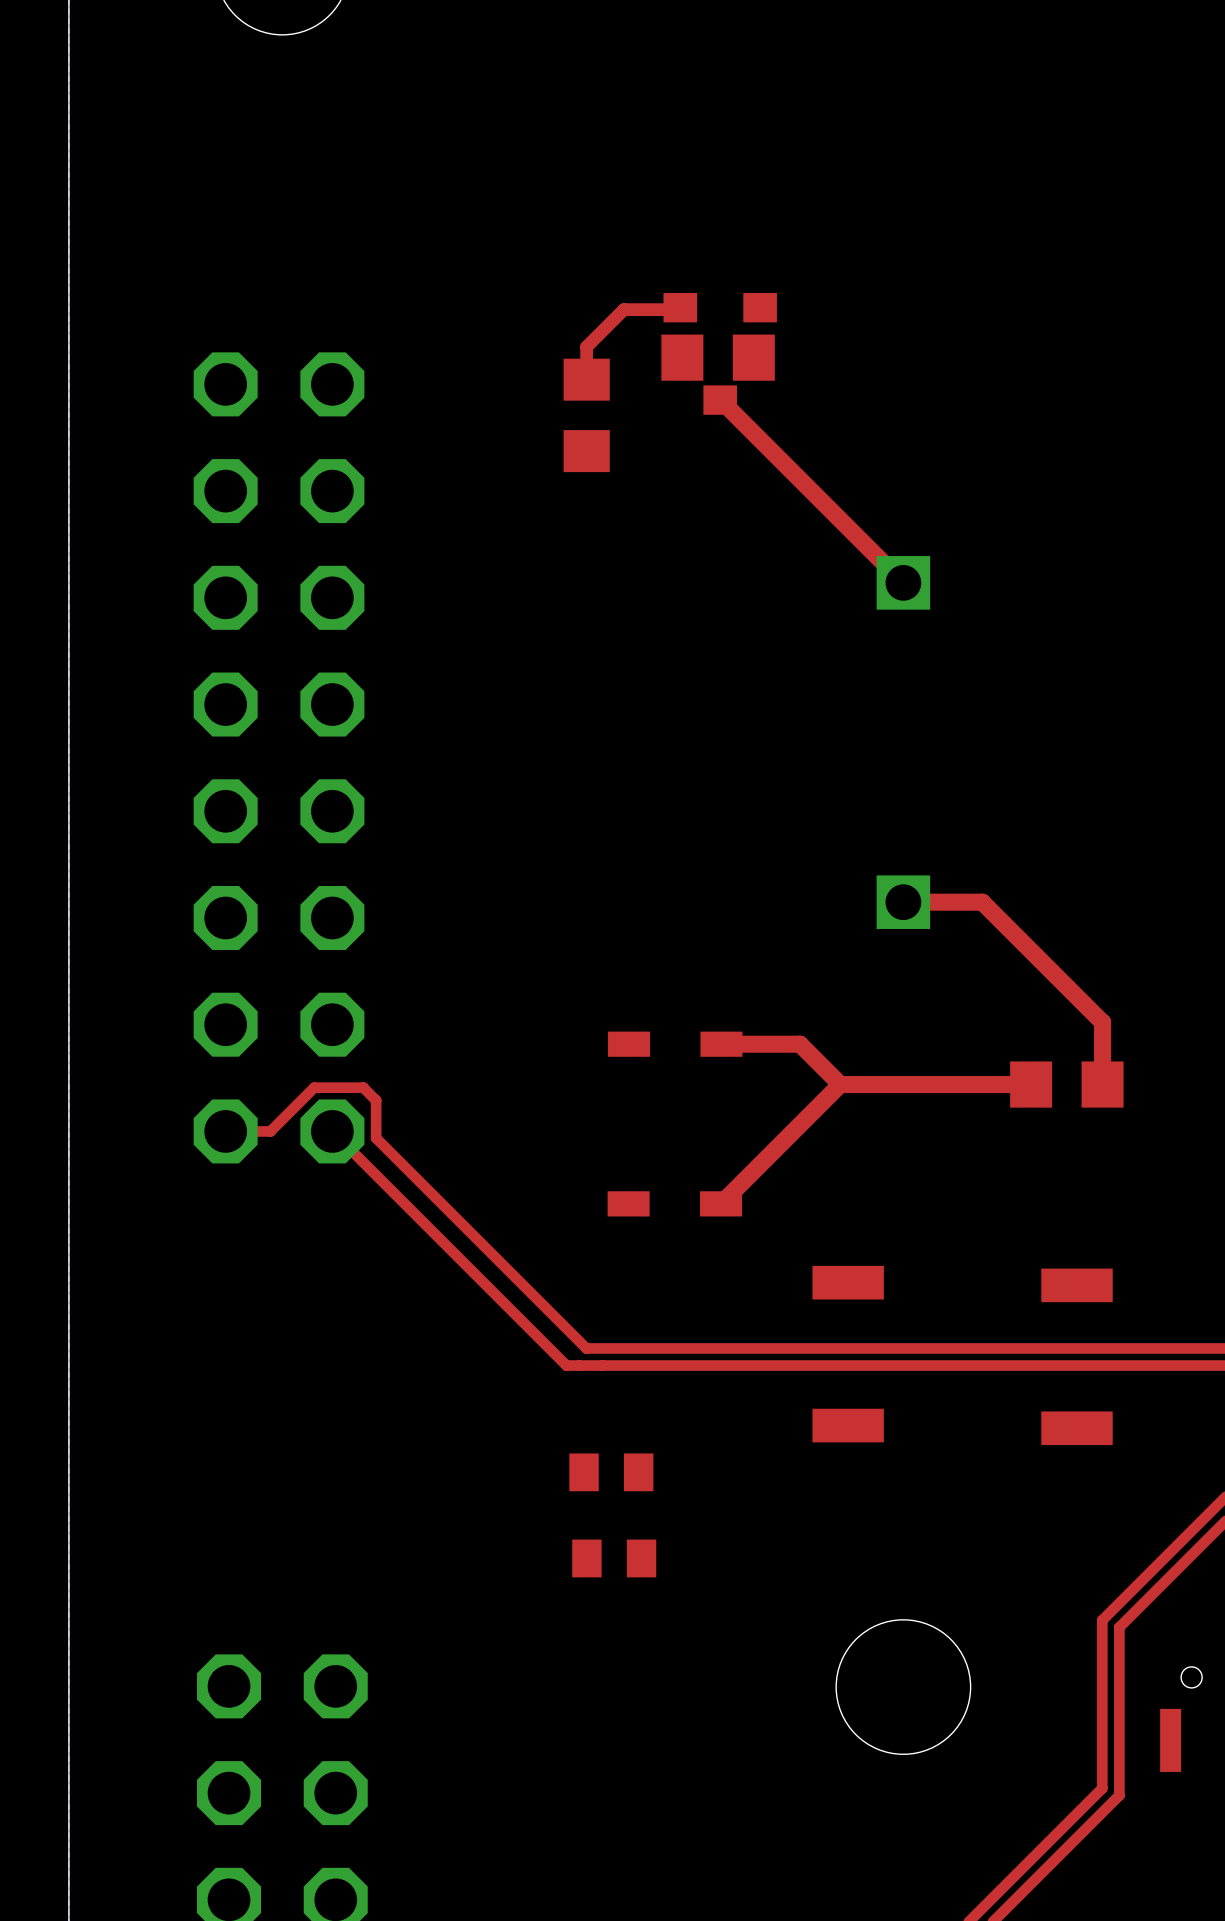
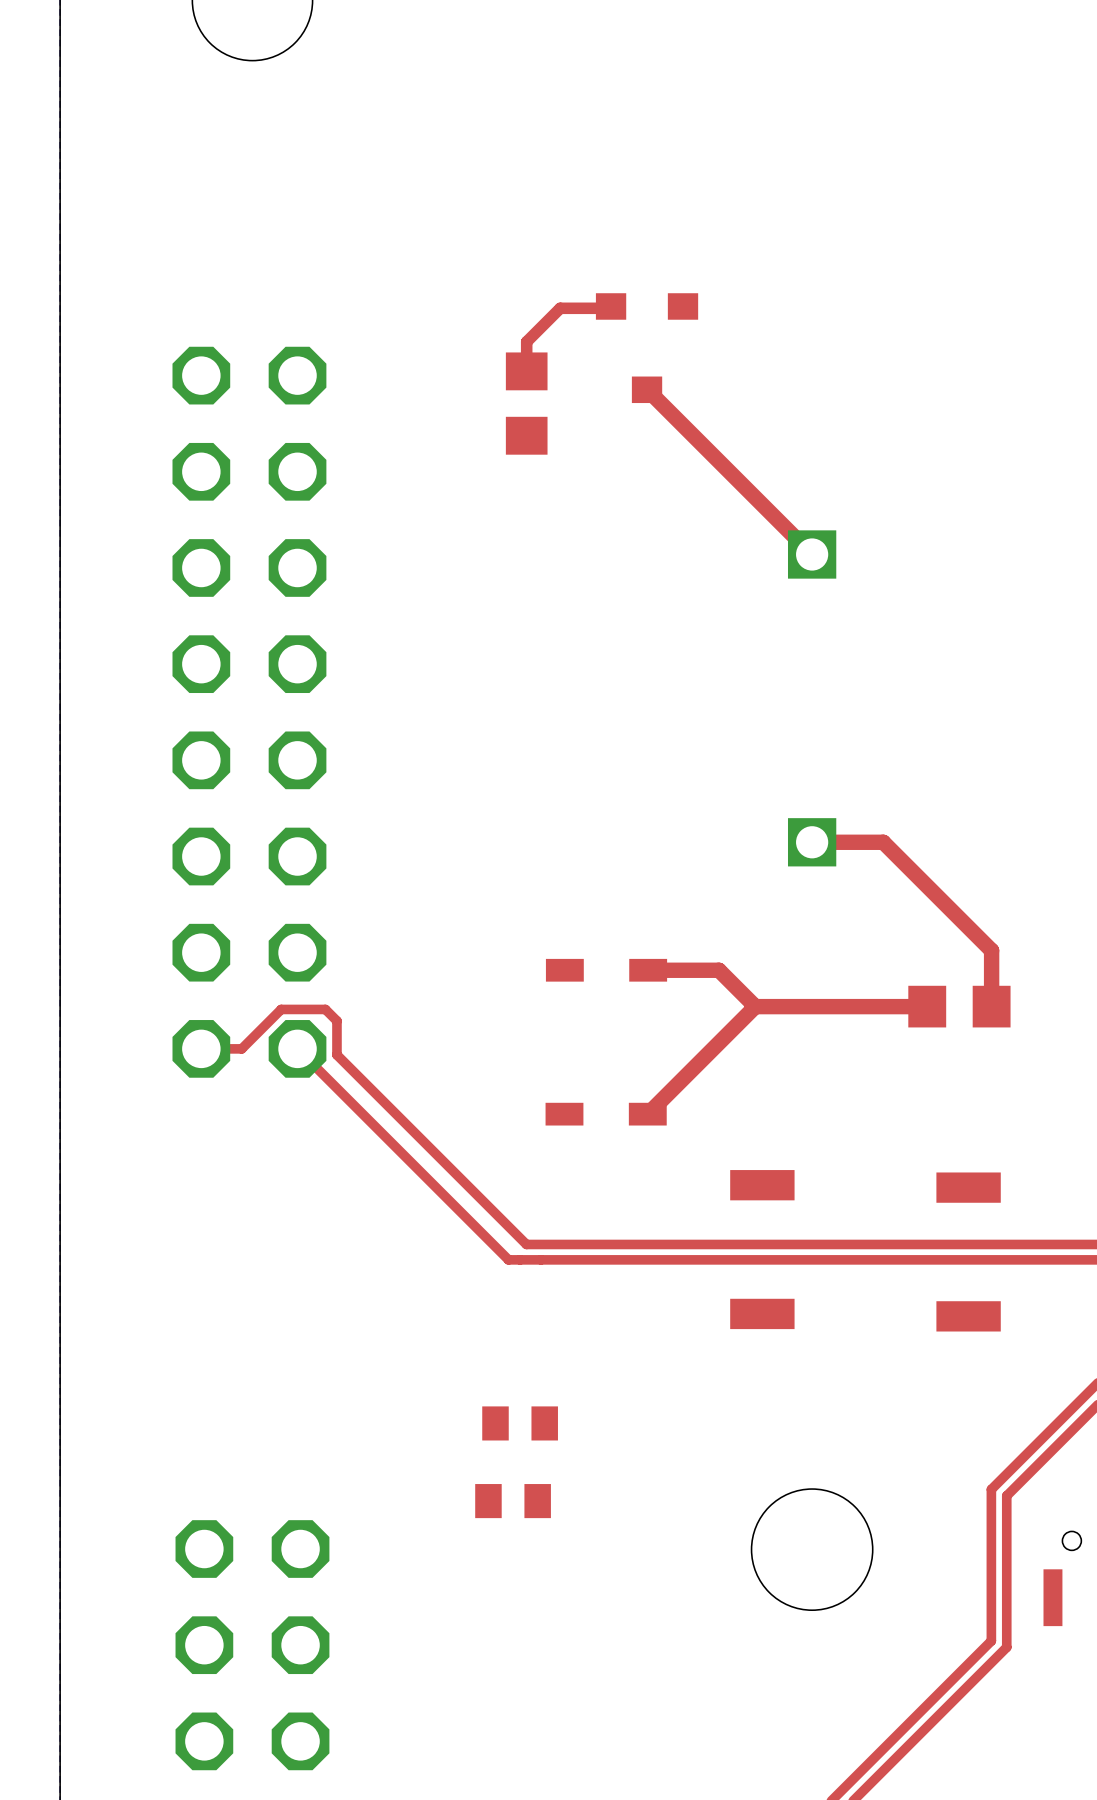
part: (718, 357) -> none
part position: (611, 1472) -> (513, 1501)
part position: (614, 1558) -> (520, 1423)

